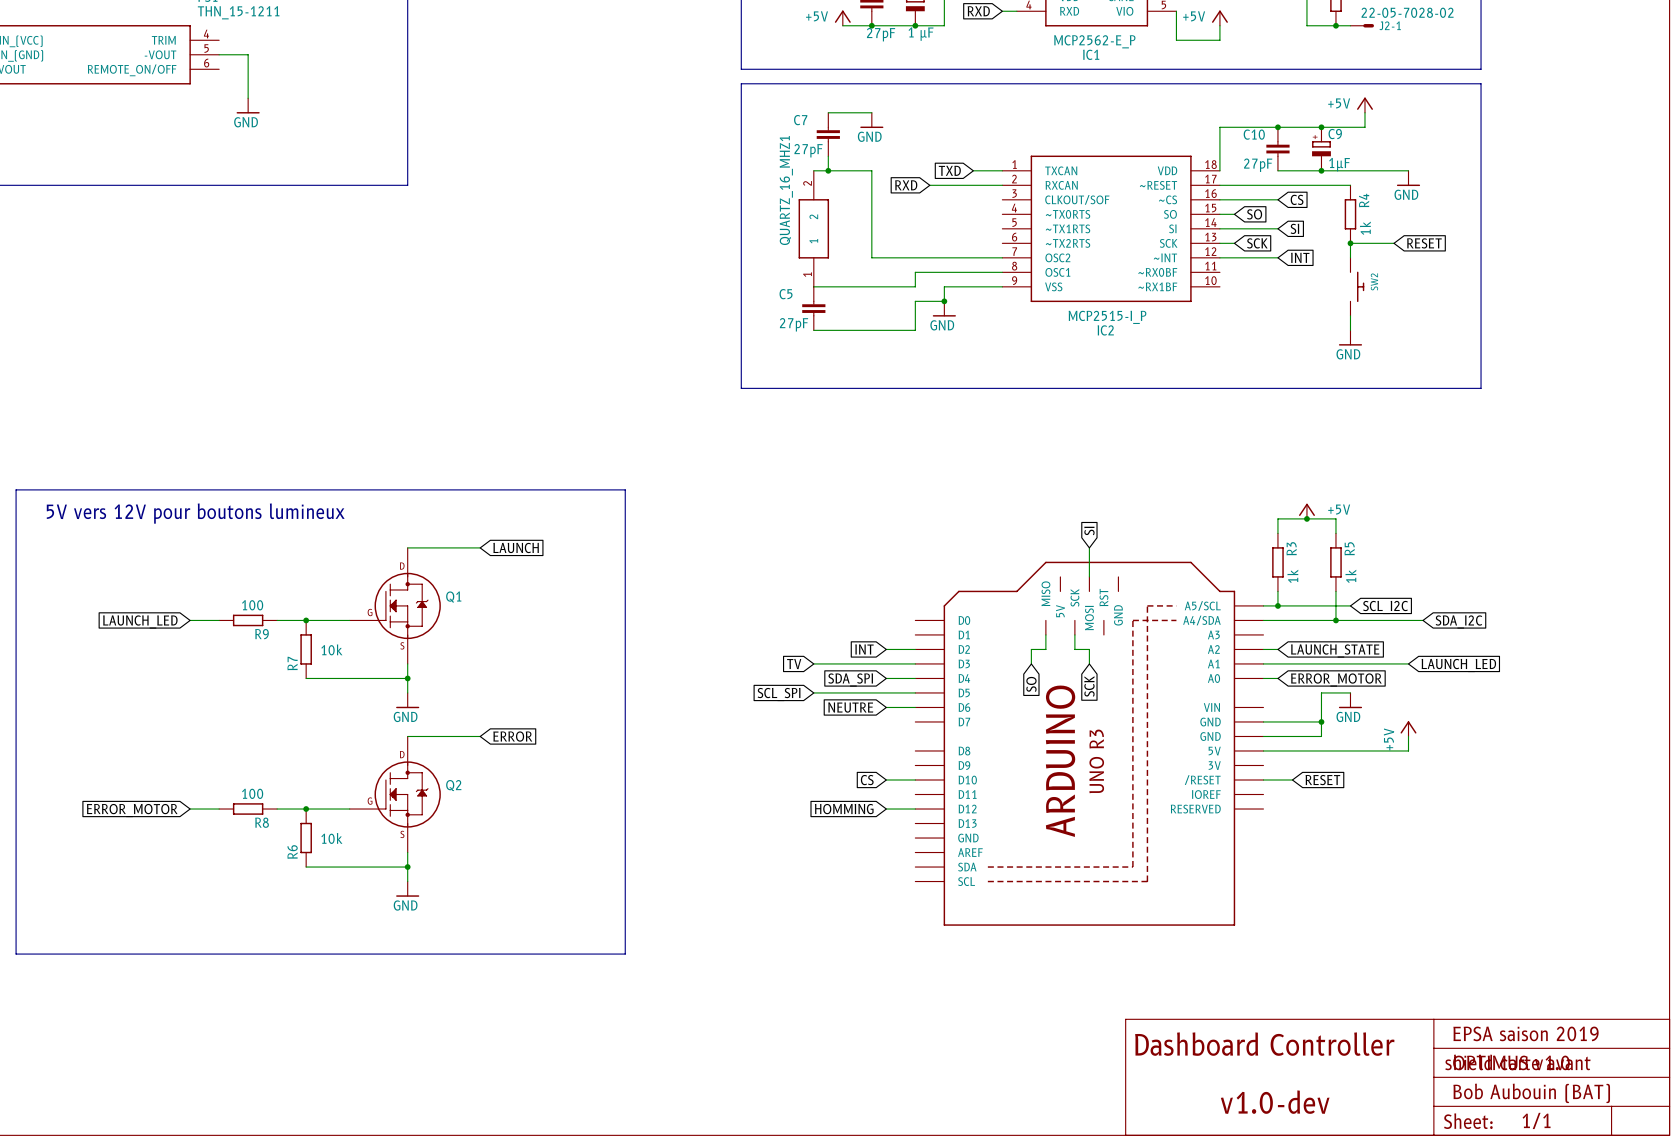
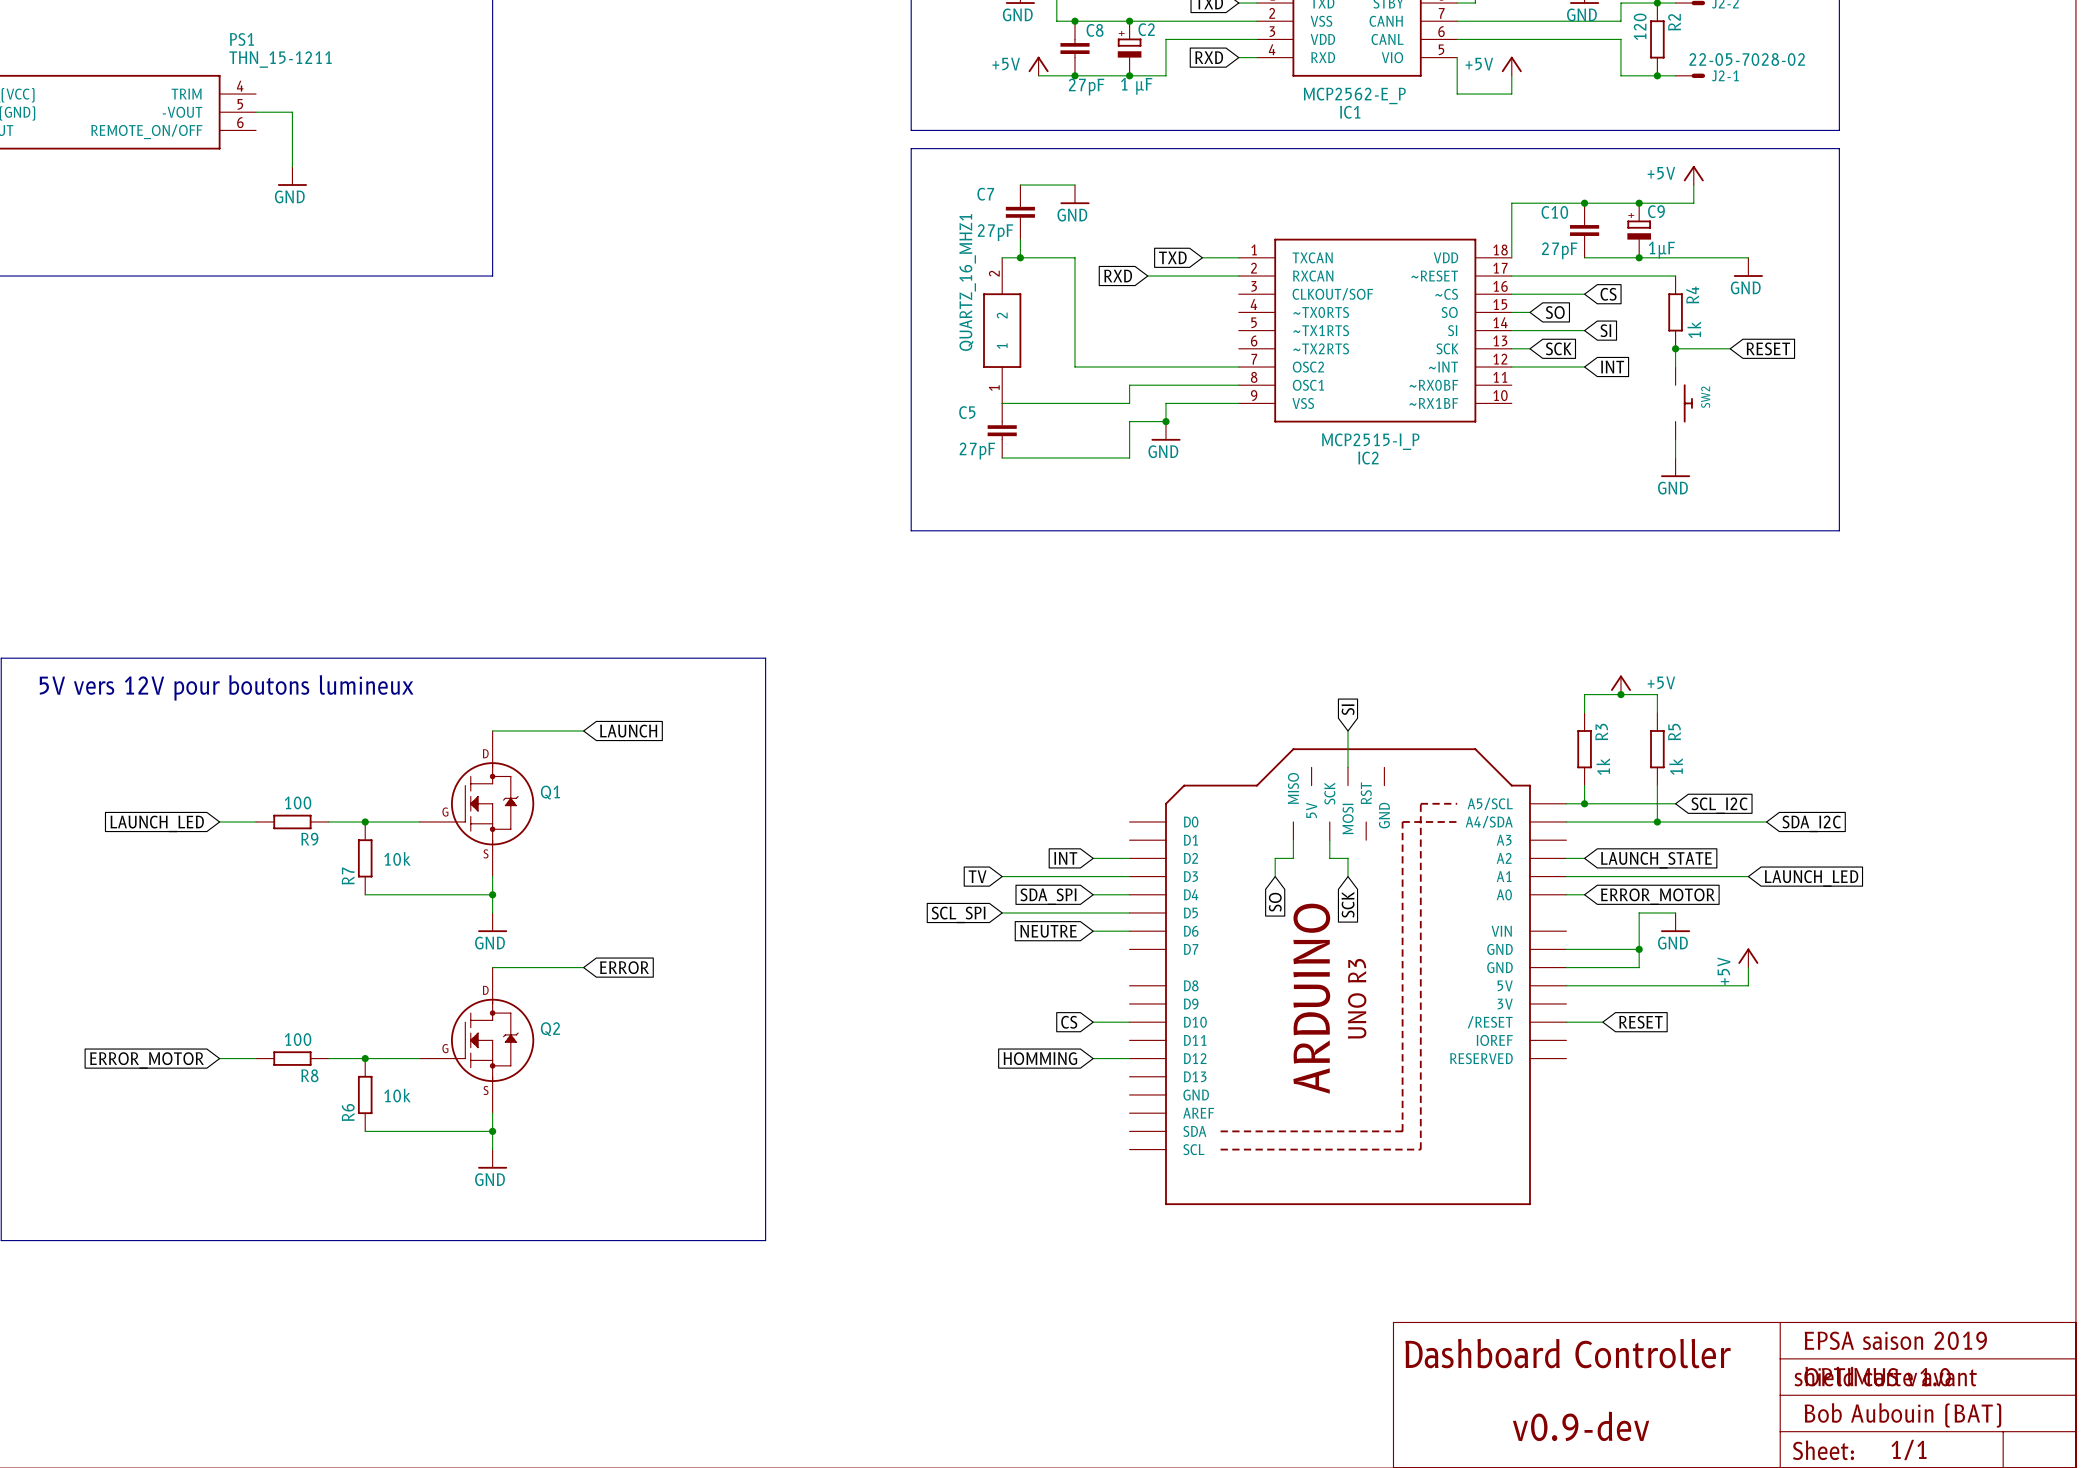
text: v1.0-dev (1275, 1102) -> v0.9-dev (1581, 1426)

